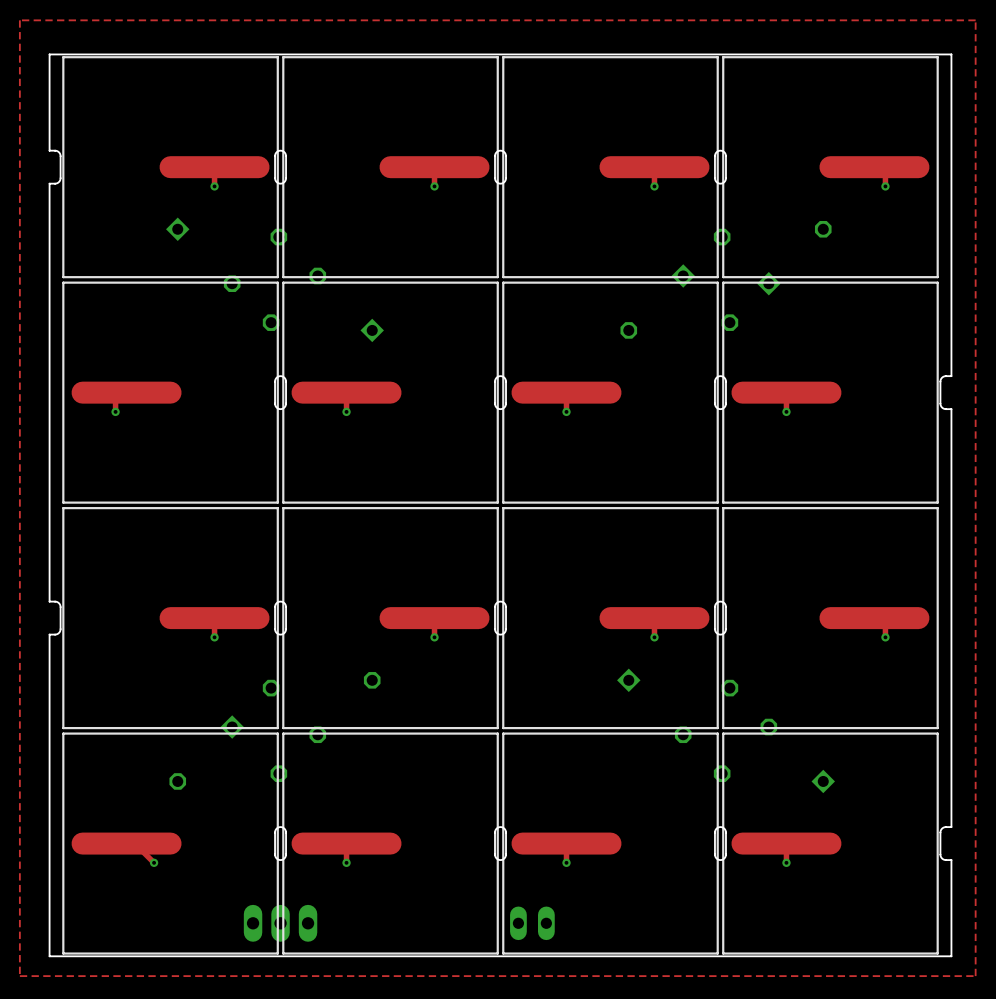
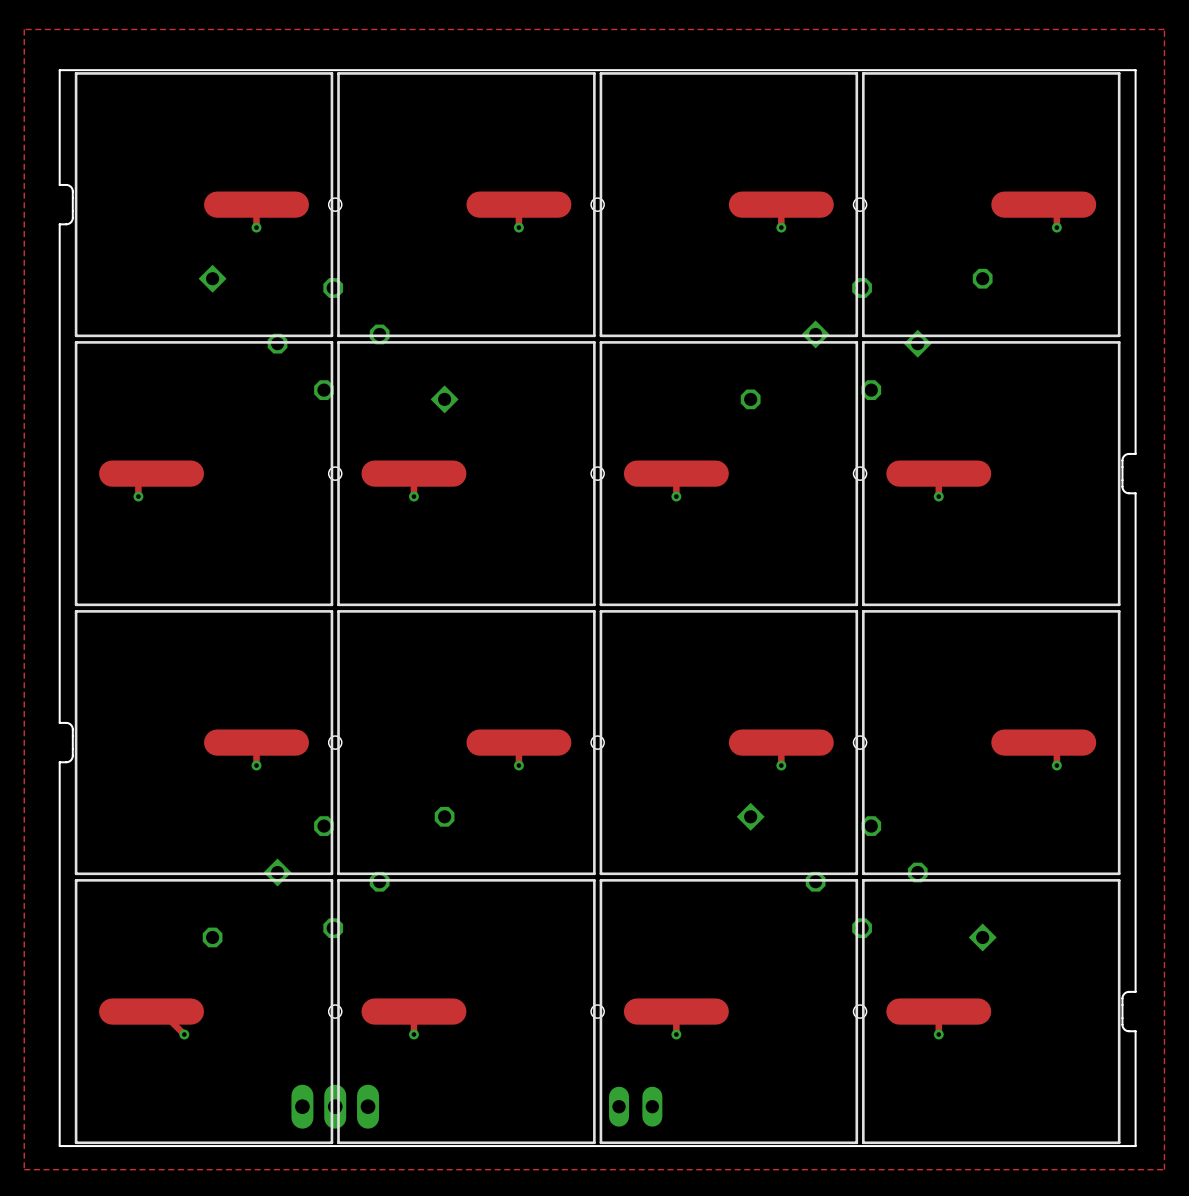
part footprint: [62, 56, 279, 279] -> [74, 72, 334, 338]
part footprint: [274, 56, 499, 279] -> [328, 72, 596, 338]
part footprint: [494, 56, 719, 279] -> [591, 72, 859, 338]
part footprint: [714, 56, 939, 279] -> [853, 72, 1121, 338]
part footprint: [62, 281, 287, 504] -> [74, 341, 342, 607]
part footprint: [282, 281, 507, 504] -> [337, 341, 605, 607]
part footprint: [502, 281, 727, 504] -> [599, 341, 867, 607]
part footprint: [722, 281, 939, 504] -> [862, 341, 1121, 607]
part footprint: [62, 507, 279, 730] -> [74, 610, 334, 876]
part footprint: [274, 507, 499, 730] -> [328, 610, 596, 876]
part footprint: [494, 507, 719, 730] -> [591, 610, 859, 876]
part footprint: [714, 507, 939, 730] -> [853, 610, 1121, 876]
part footprint: [62, 732, 287, 955] -> [74, 879, 342, 1145]
part footprint: [282, 732, 507, 955] -> [337, 879, 605, 1145]
part footprint: [502, 732, 727, 955] -> [599, 879, 867, 1145]
part footprint: [722, 732, 939, 955] -> [862, 879, 1121, 1145]

